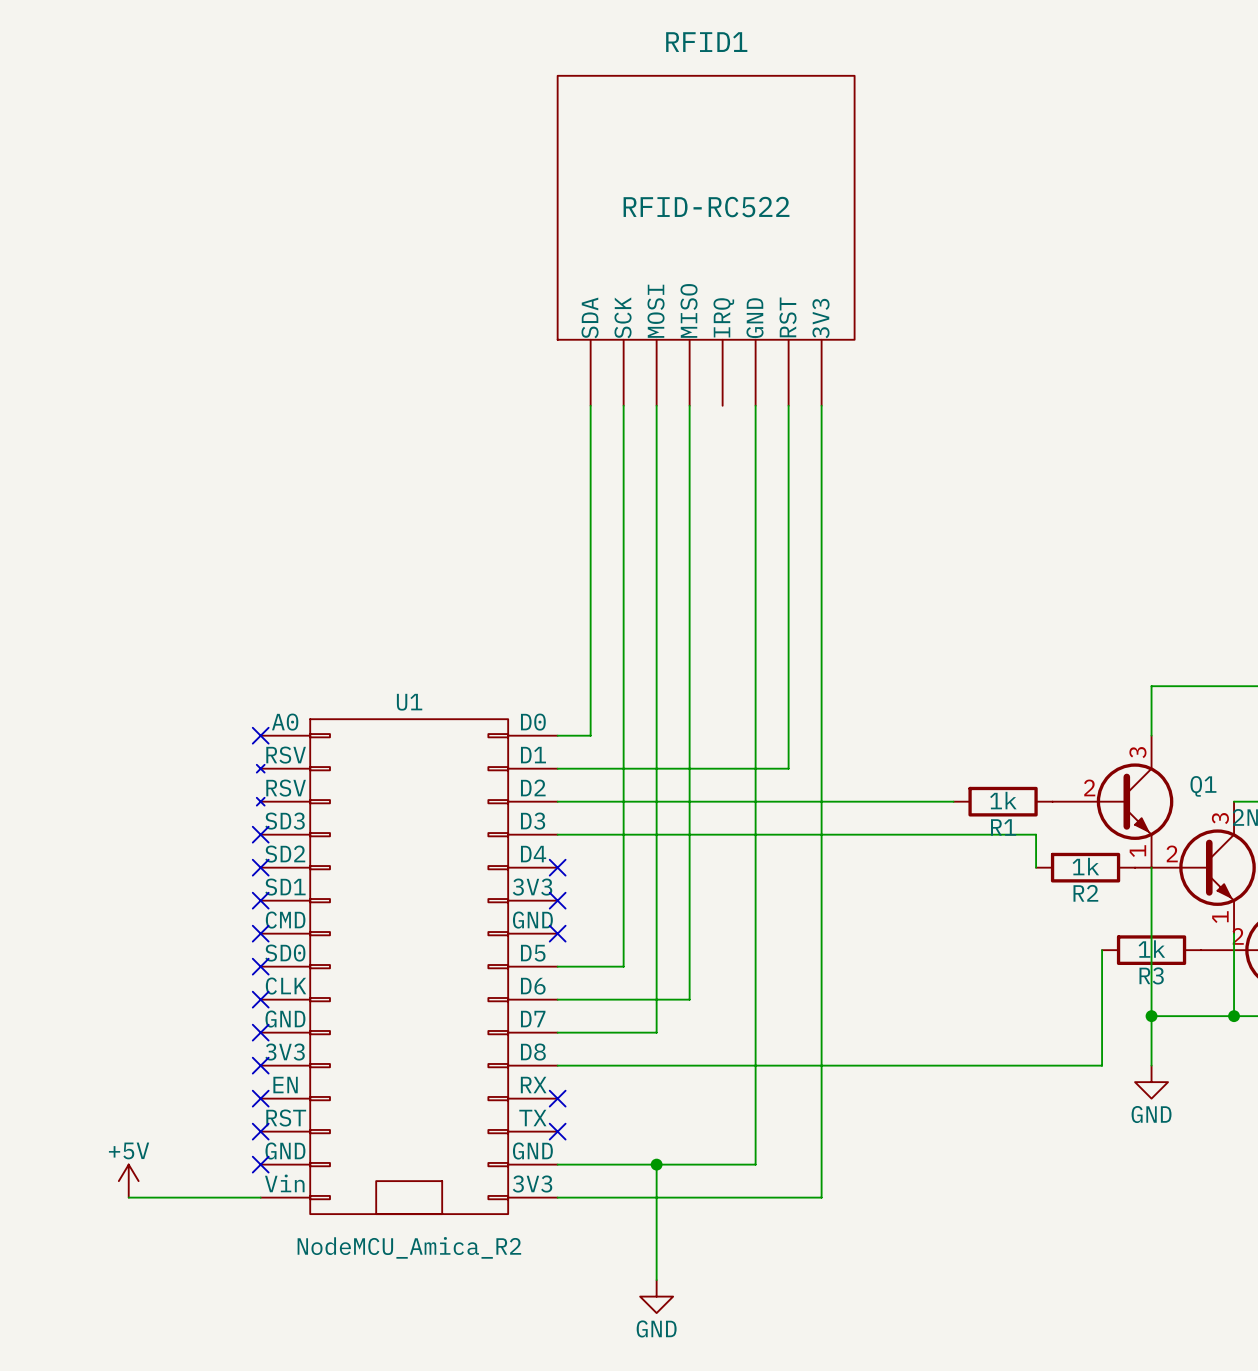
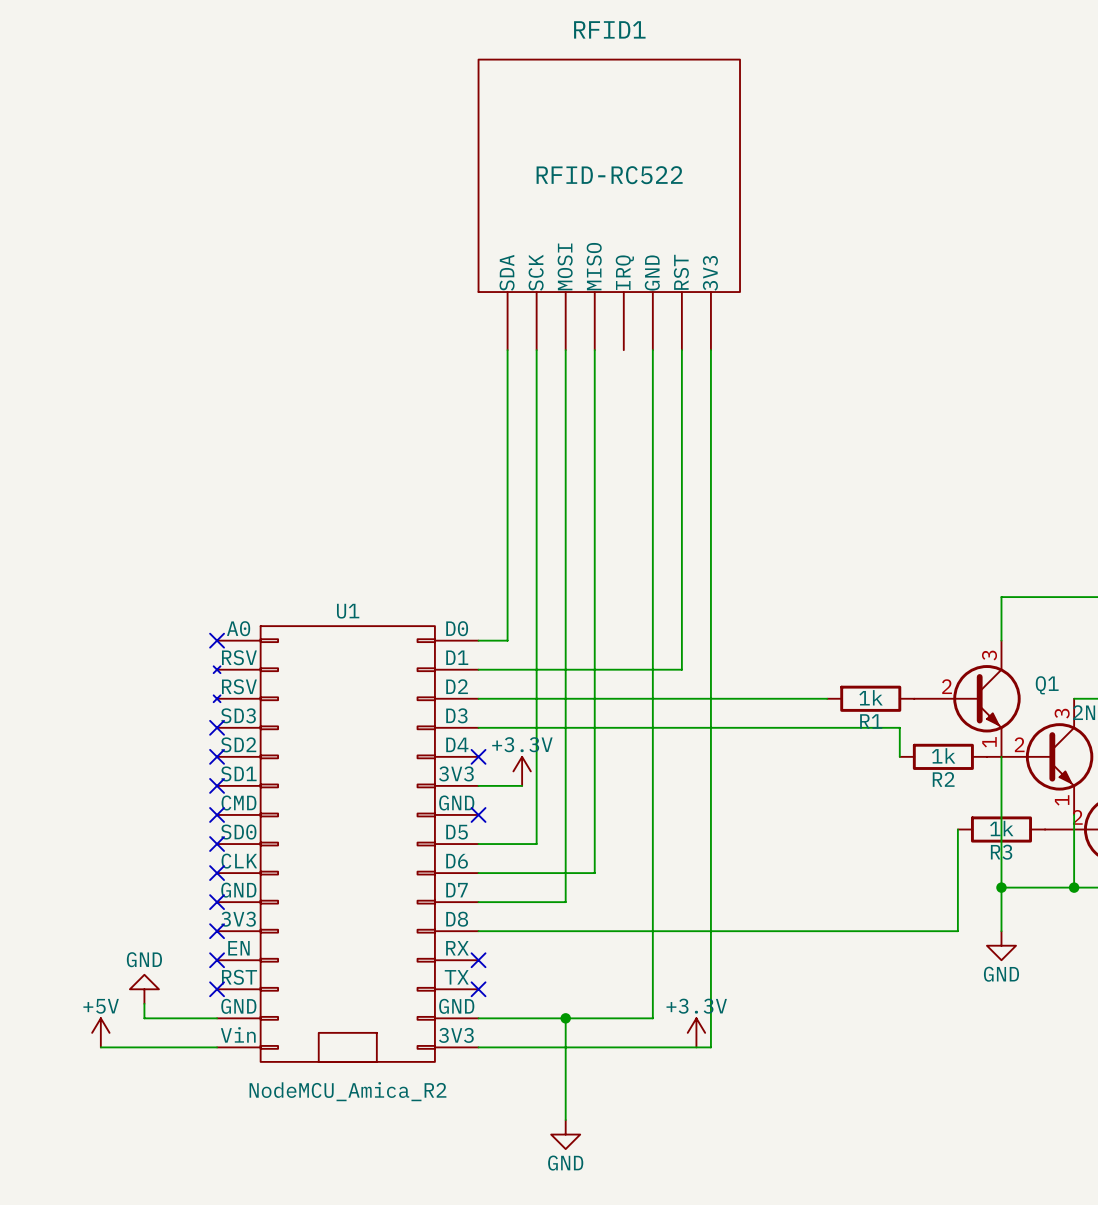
power symbol: none -> +3.3V (522, 771)
wire: none -> (478, 785) (522, 785)
no-connect mark: (557, 900) -> none
power symbol: none -> GND (144, 989)
wire: none -> (144, 1003) (144, 1018) (217, 1018)
no-connect mark: (260, 1164) -> none
power symbol: none -> +3.3V (696, 1032)

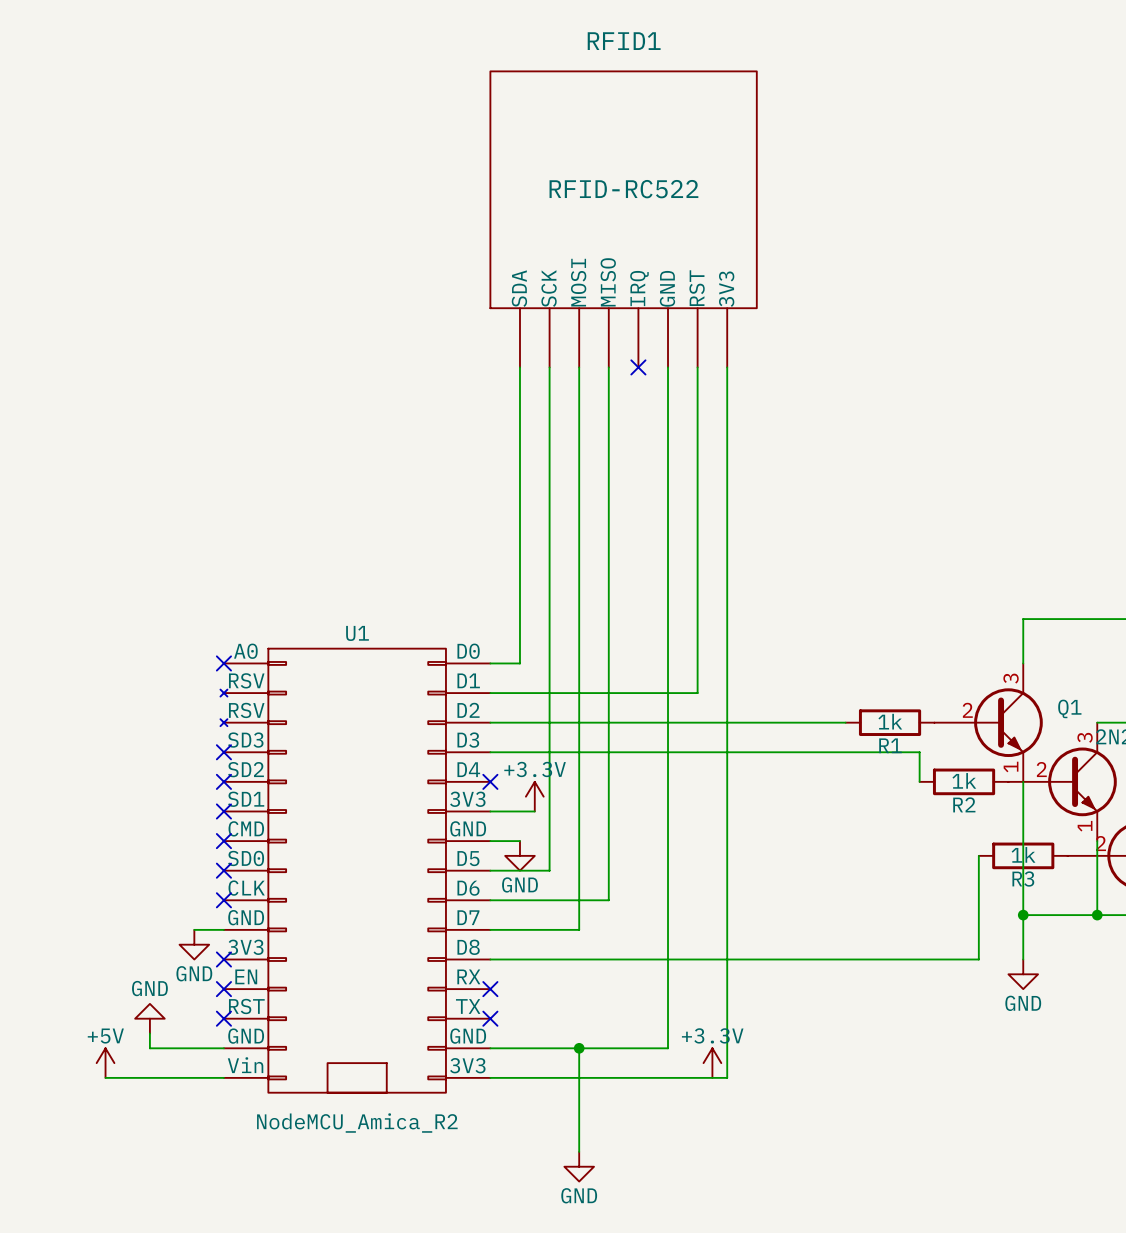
no-connect mark: none -> (638, 367)
wire: none -> (490, 841) (519, 841)
no-connect mark: (478, 814) -> none
power symbol: none -> GND (519, 855)
wire: none -> (194, 929) (223, 929)
no-connect mark: (217, 902) -> none
power symbol: none -> GND (194, 944)

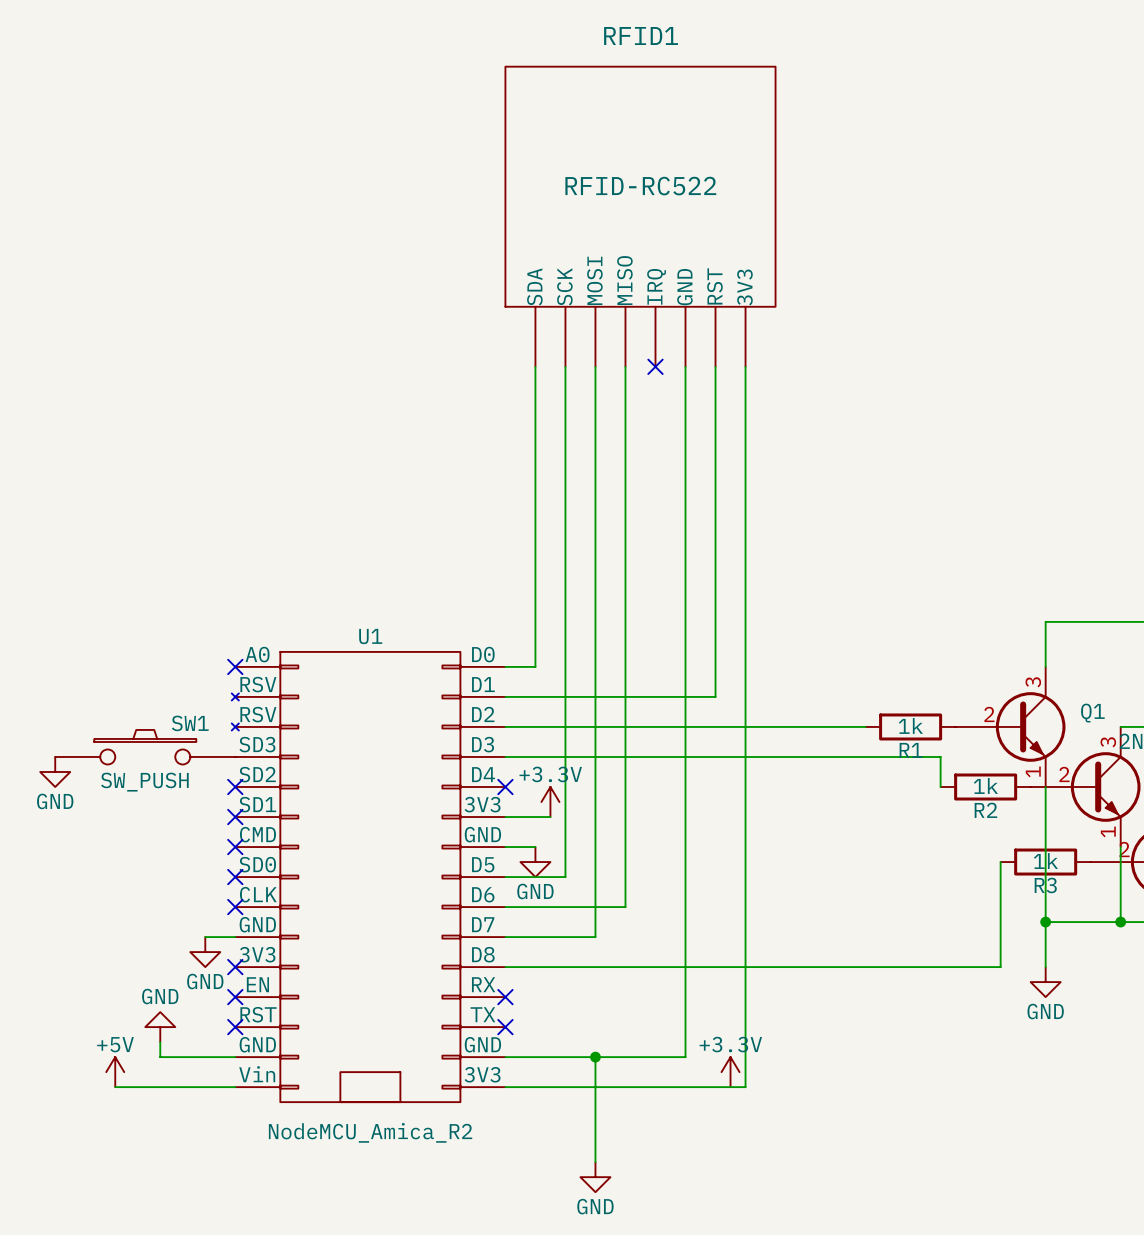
SW1: none -> SW_PUSH (145, 747)
no-connect mark: (223, 752) -> none
power symbol: none -> GND (55, 771)

